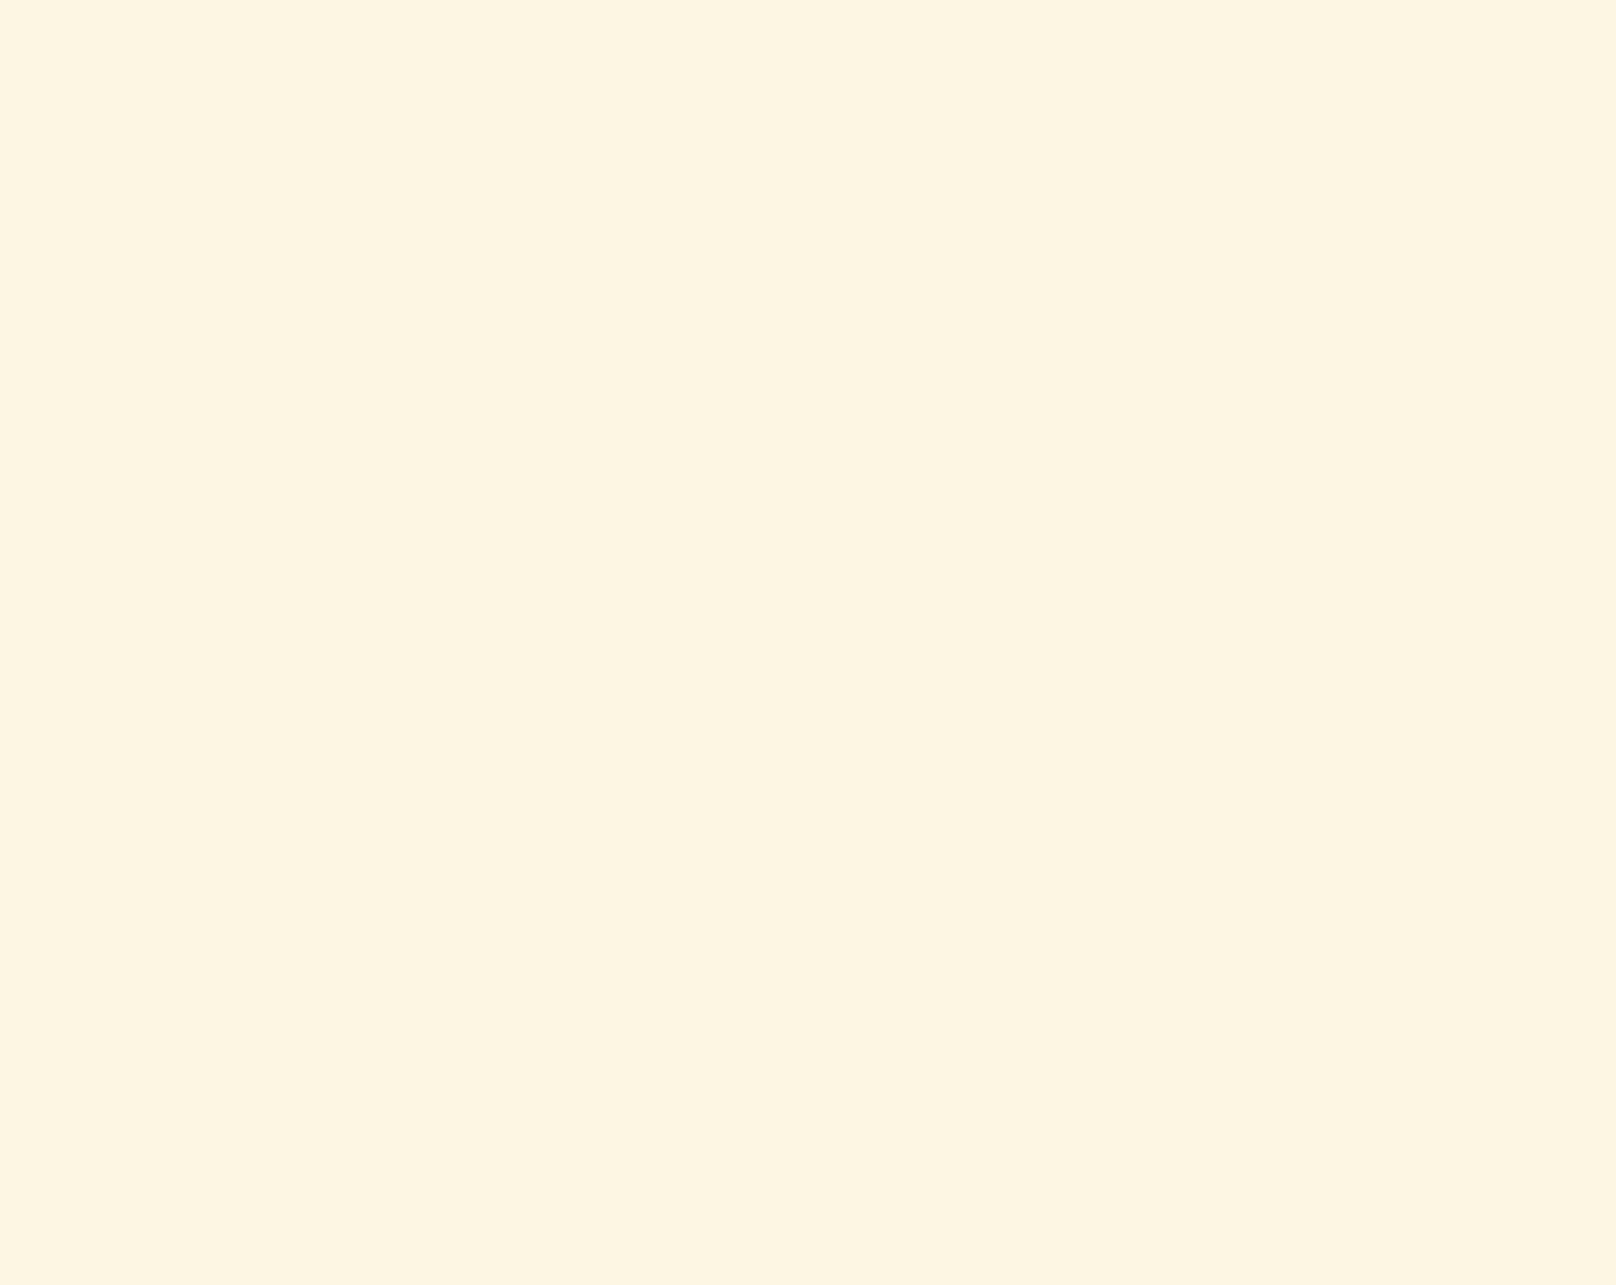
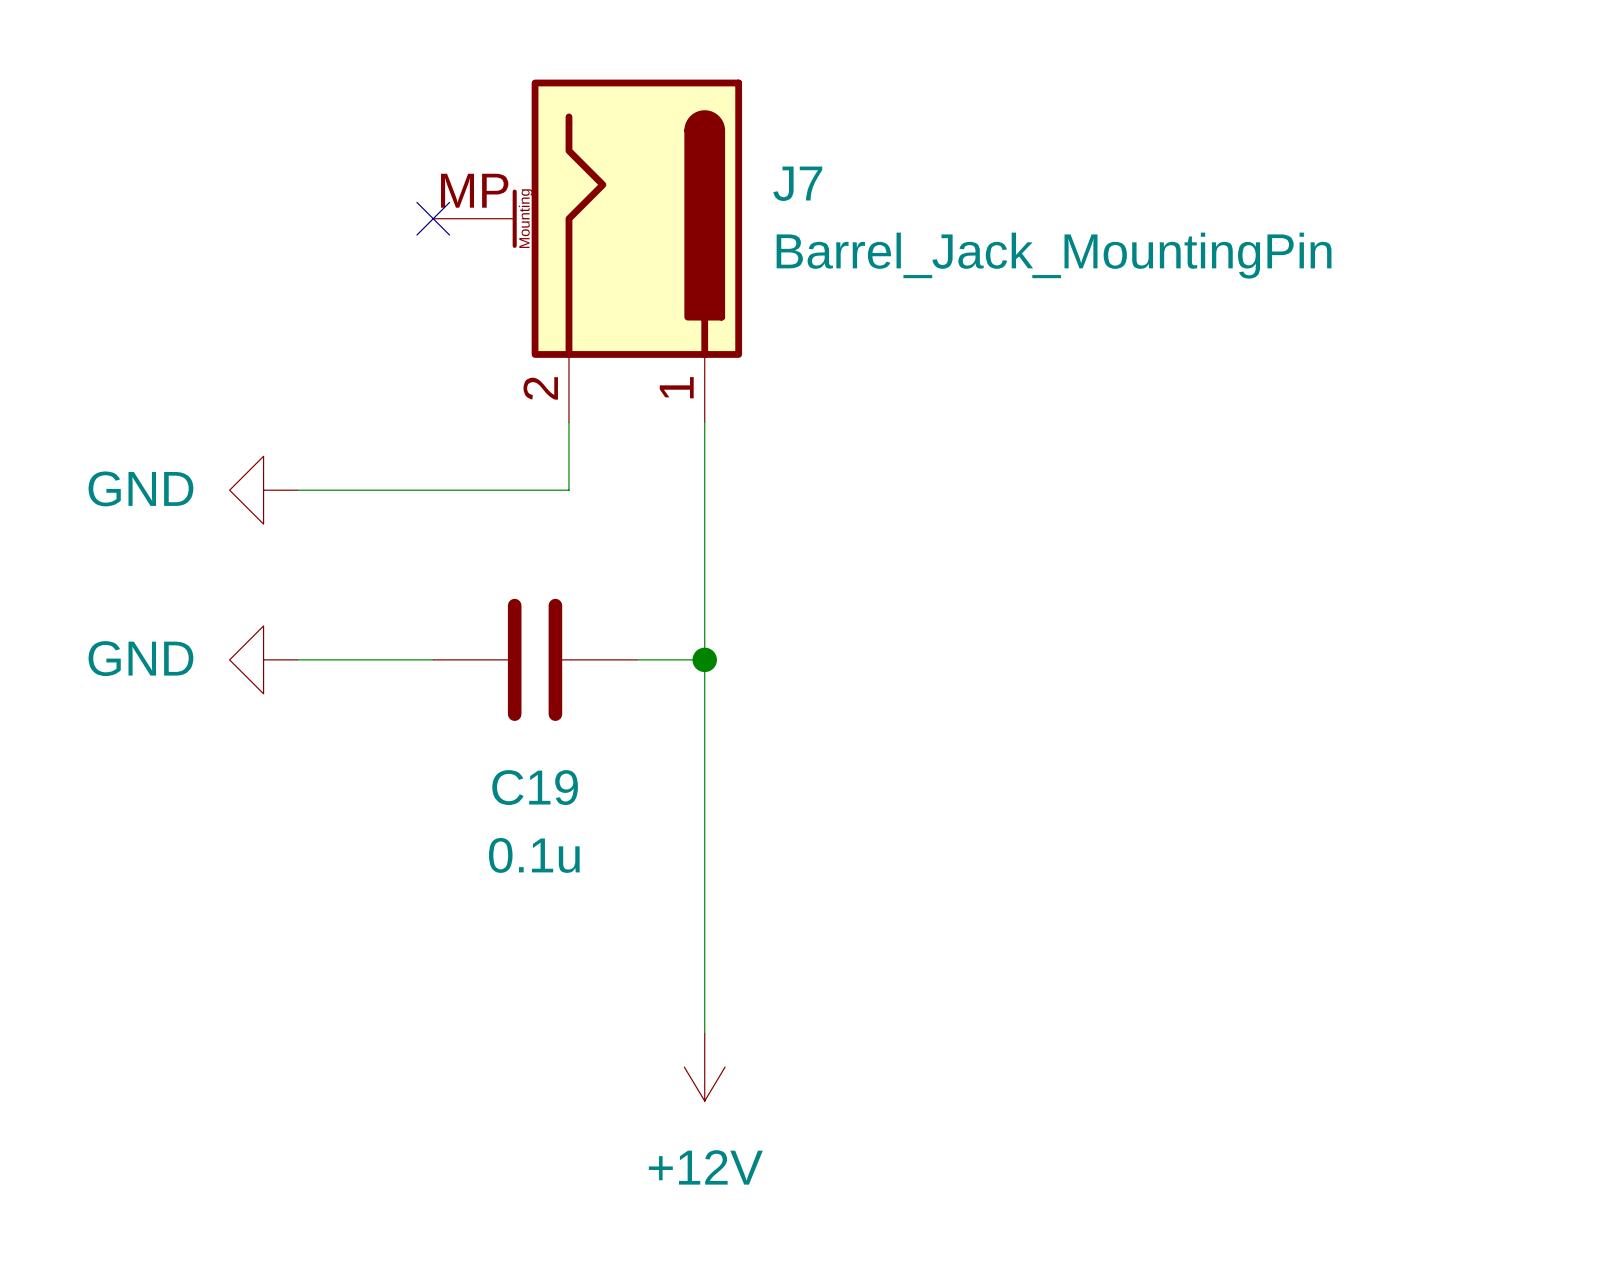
no-connect mark: none -> (433, 218)
J7: none -> Barrel_Jack_MountingPin (587, 250)
wire: none -> (568, 422) (568, 490) (297, 490)
wire: none -> (704, 422) (704, 1033)
power symbol: none -> GND (263, 490)
power symbol: none -> GND (263, 659)
wire: none -> (297, 659) (433, 659)
C19: none -> 0.1u (535, 659)
wire: none -> (636, 659) (704, 659)
junction: none -> (704, 659)
power symbol: none -> +12V (704, 1067)

